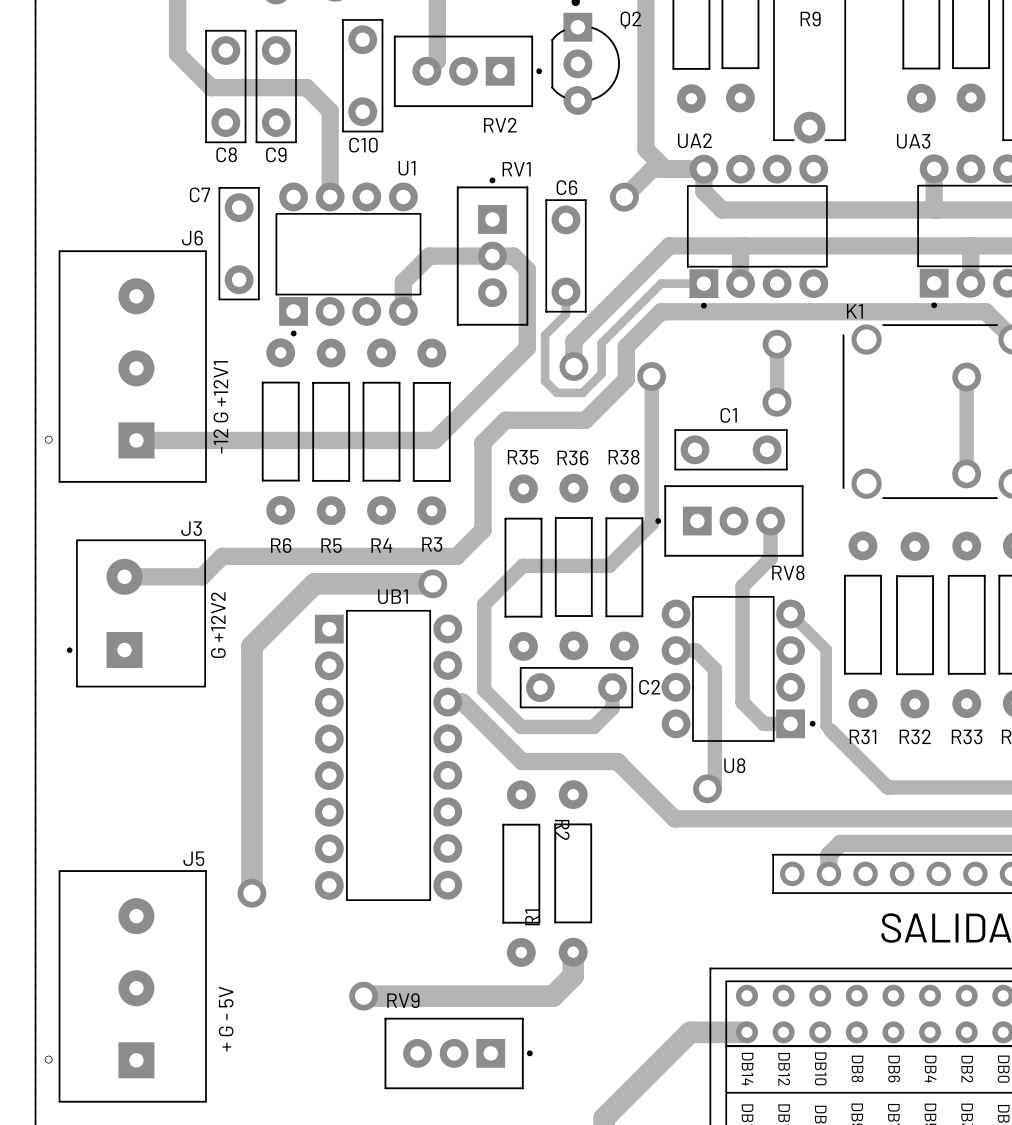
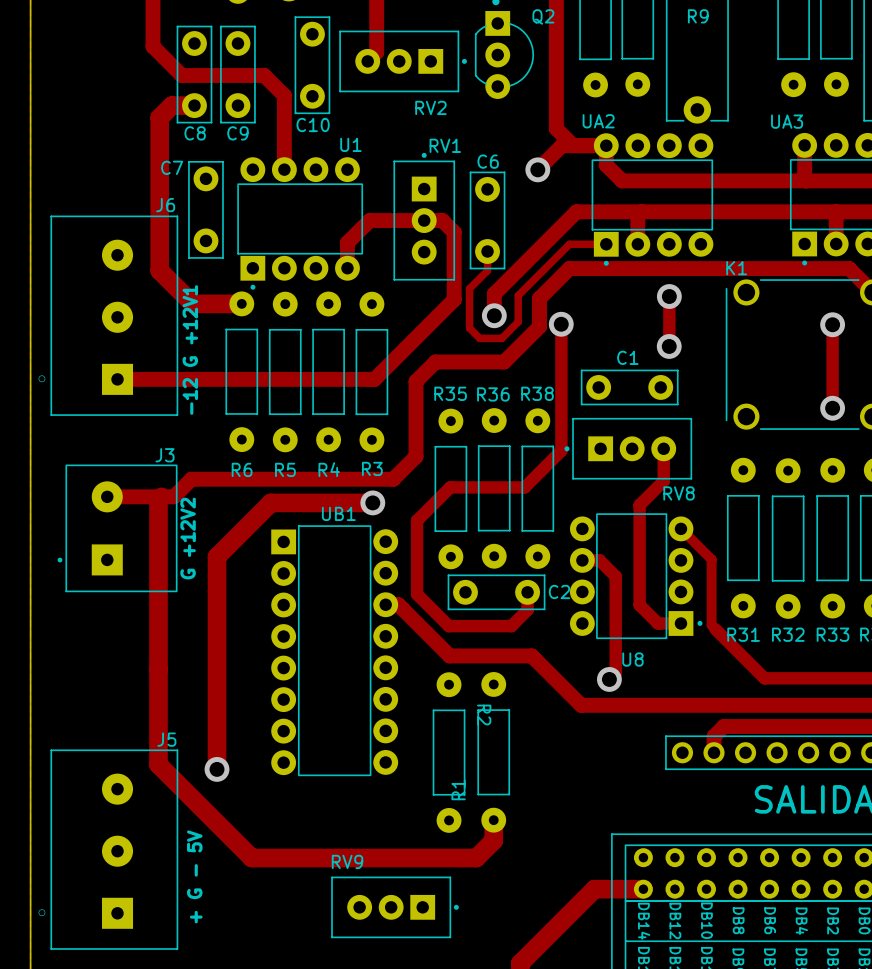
track: none -> (194, 105) (171, 105) (159, 117) (159, 270) (192, 303) (241, 303)
track: none -> (161, 496) (158, 499) (158, 764) (251, 858) (313, 858)
via: (363, 996) -> none

